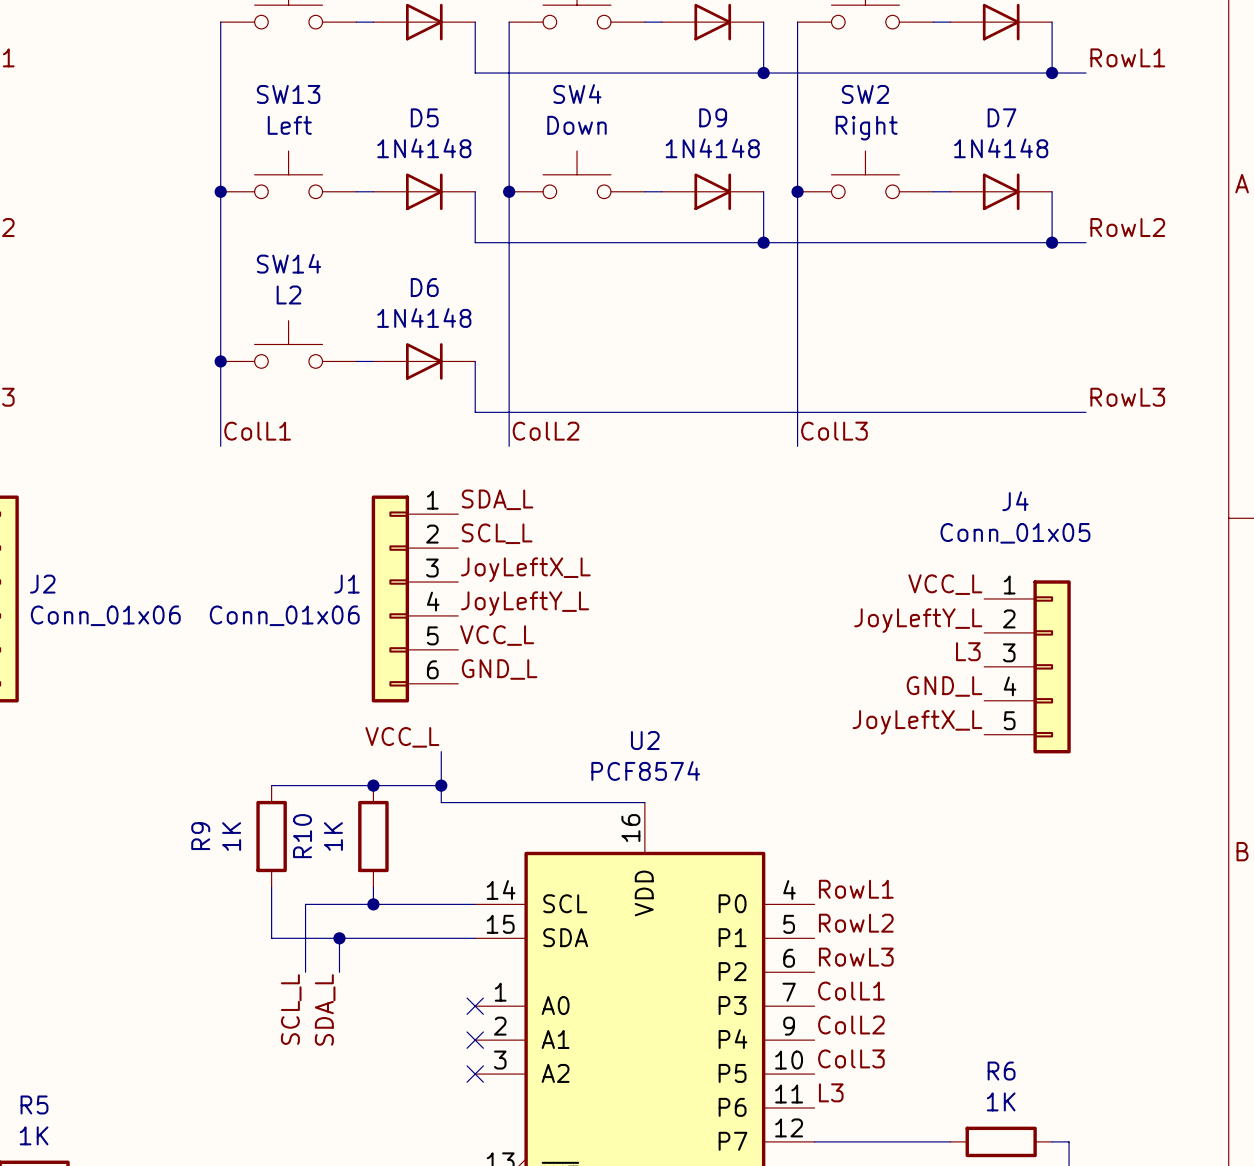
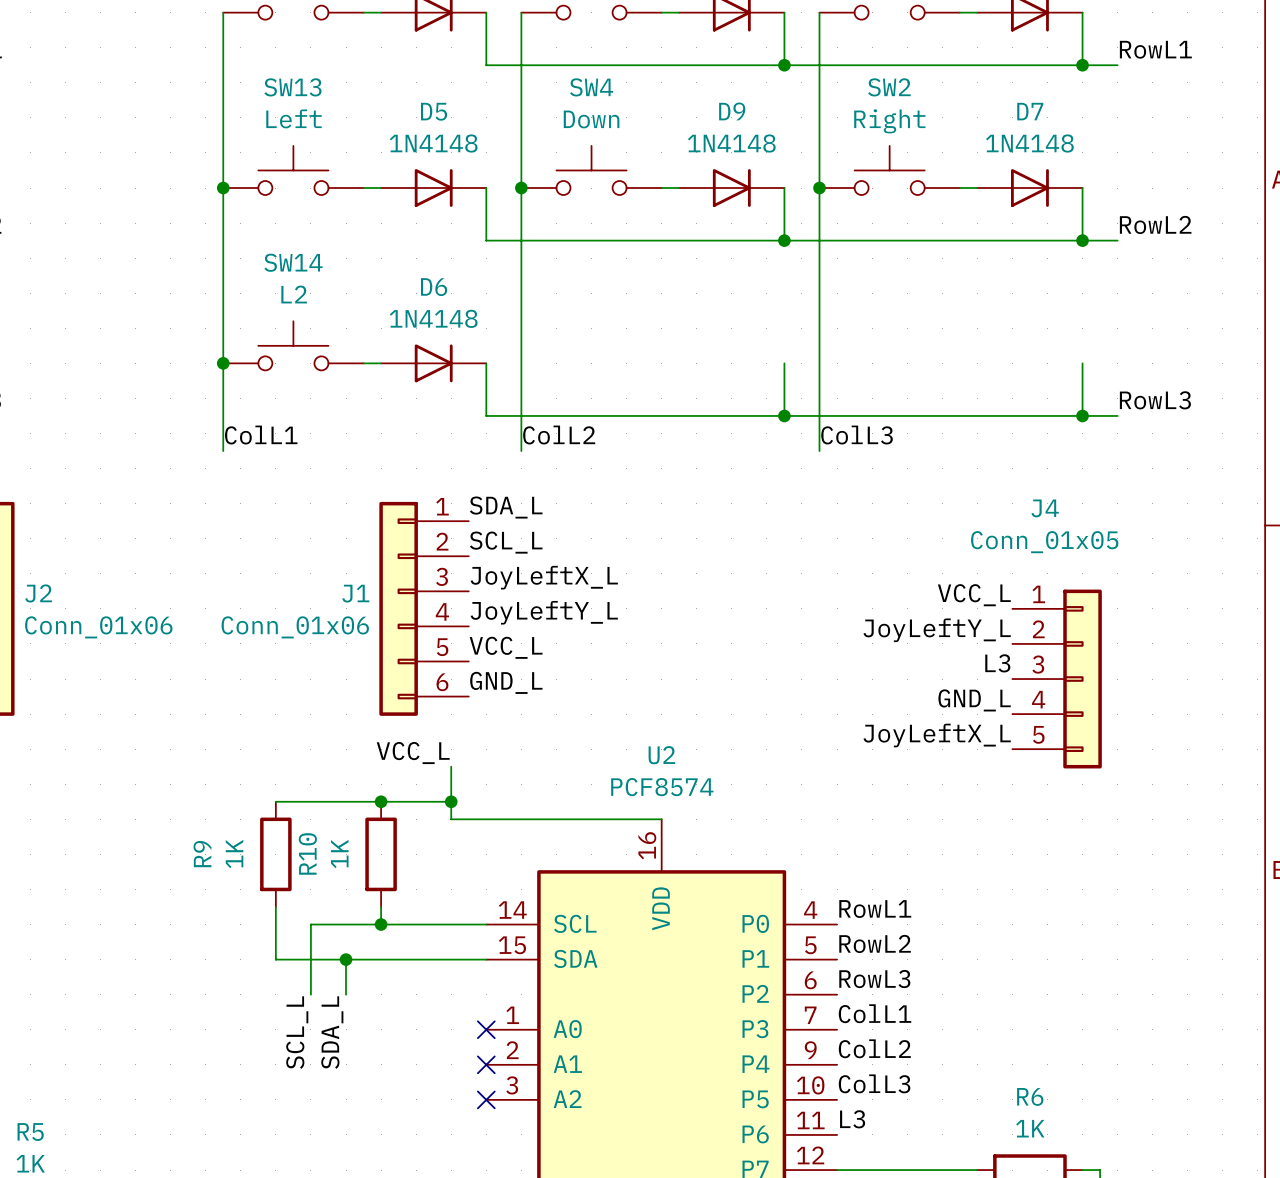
wire: none -> (784, 363) (784, 415)
wire: none -> (1082, 363) (1082, 415)
junction: none -> (784, 415)
junction: none -> (1082, 415)

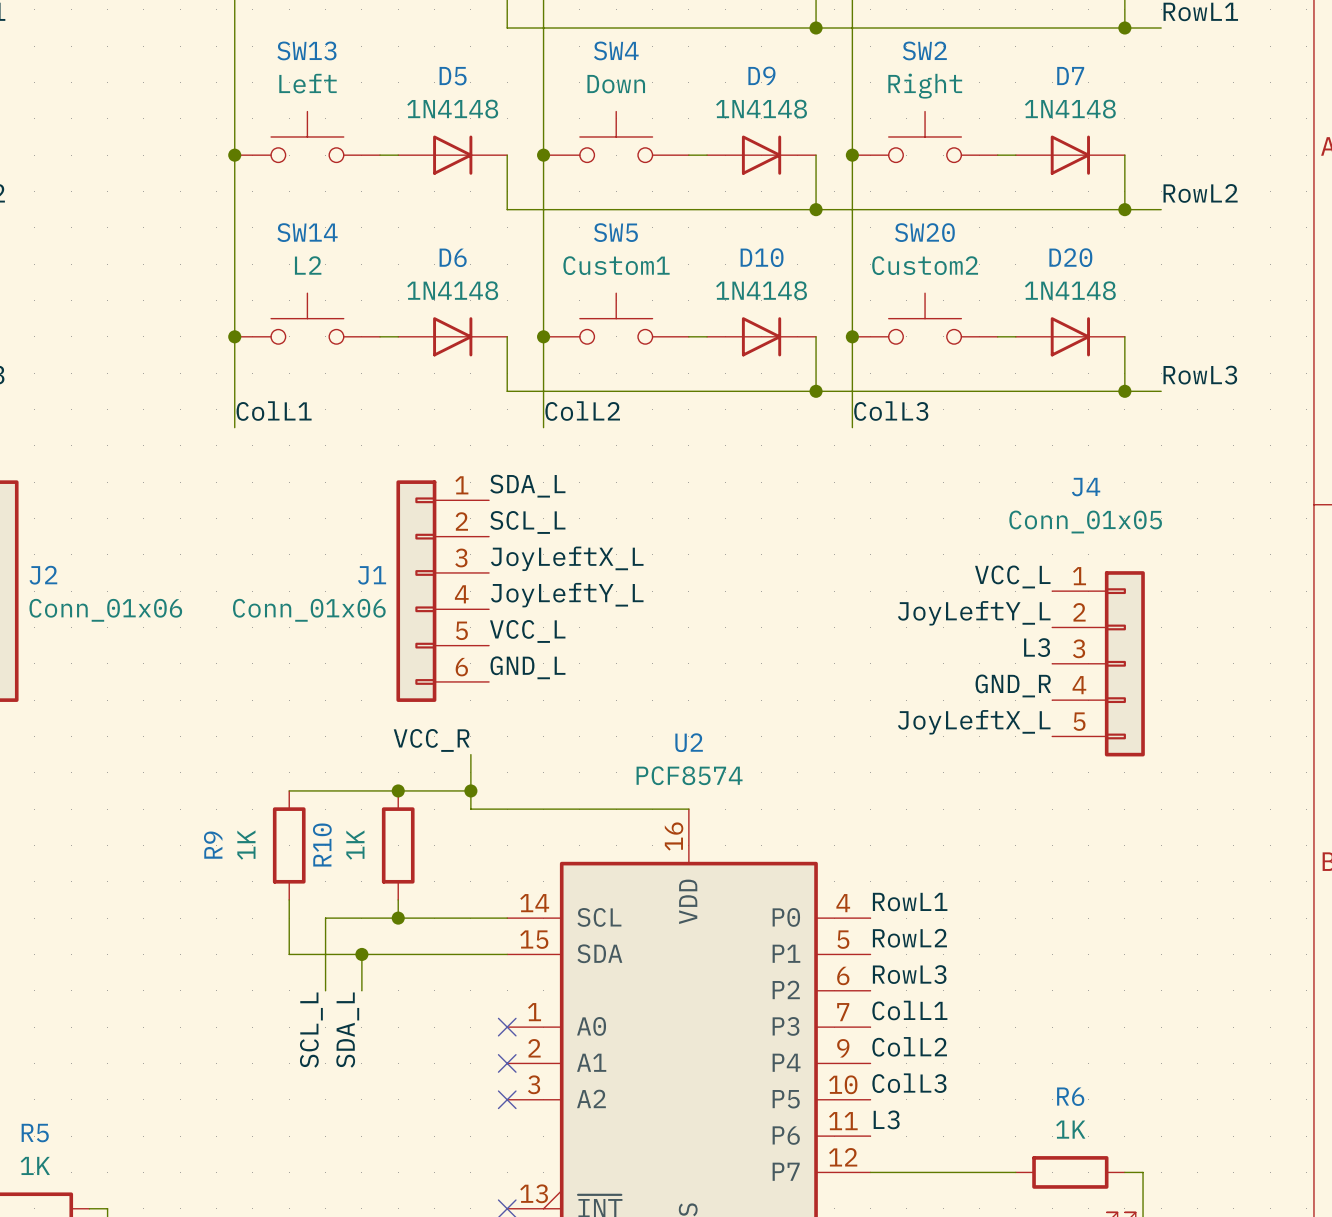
SW5: none -> Custom1 (616, 318)
SW20: none -> Custom2 (925, 318)
junction: none -> (543, 336)
wire: none -> (688, 336) (707, 336)
D10: none -> 1N4148 (761, 336)
junction: none -> (852, 336)
wire: none -> (997, 336) (1015, 336)
D20: none -> 1N4148 (1070, 336)
label: GND_L (974, 700) -> GND_R (1013, 685)
label: VCC_L (413, 753) -> VCC_R (431, 740)

